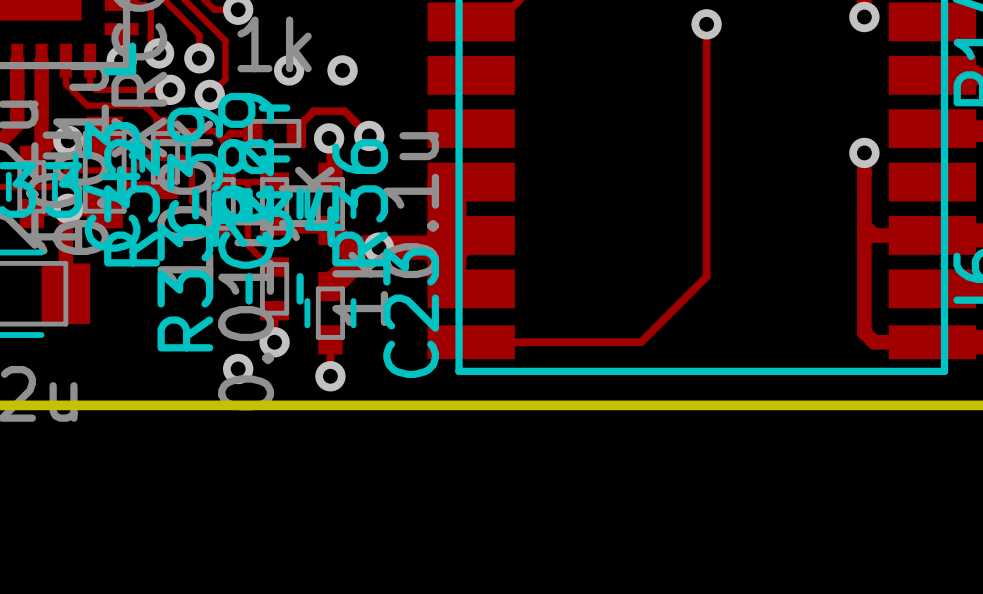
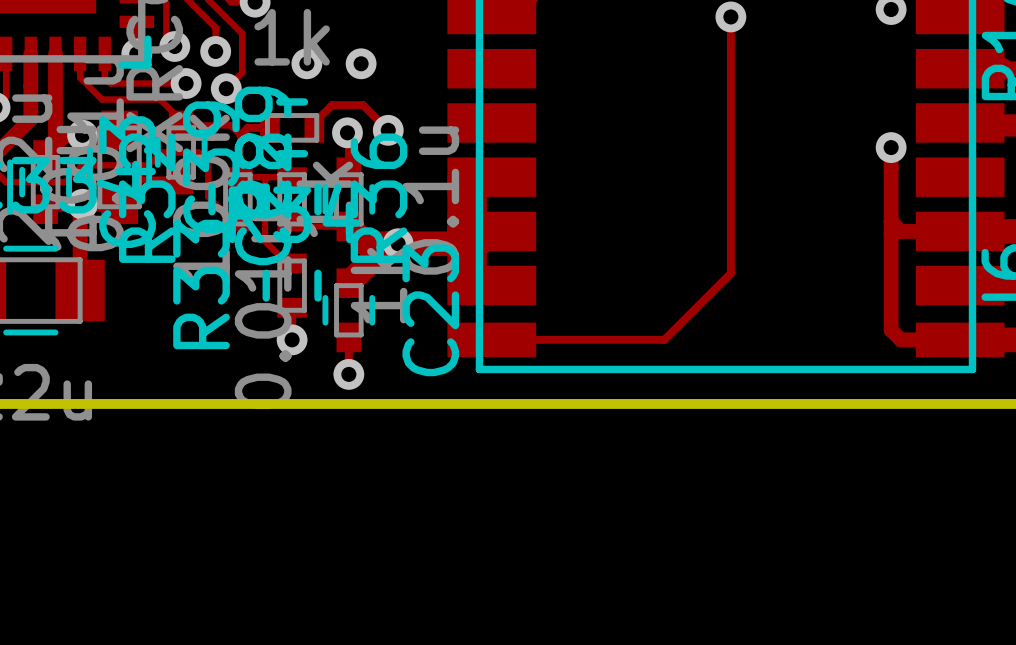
via: (238, 368) -> none

